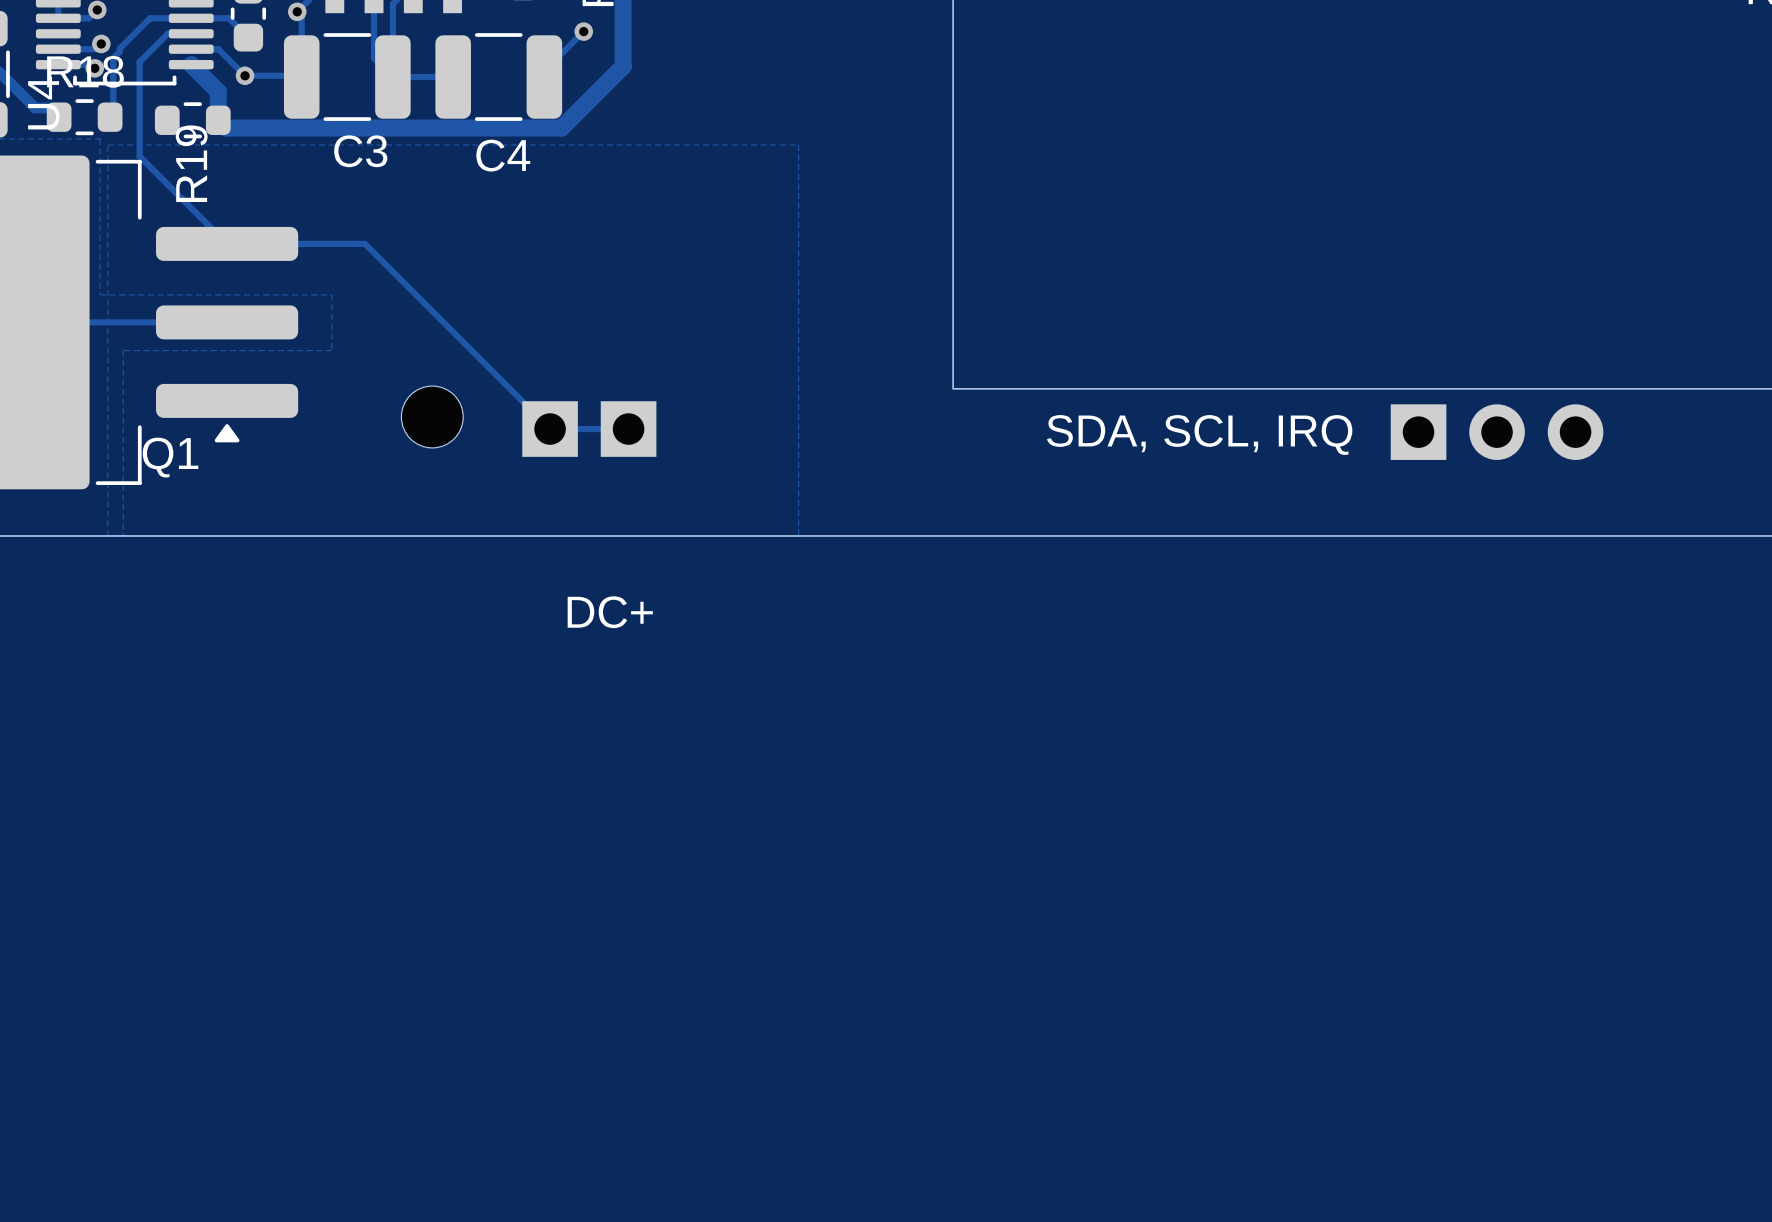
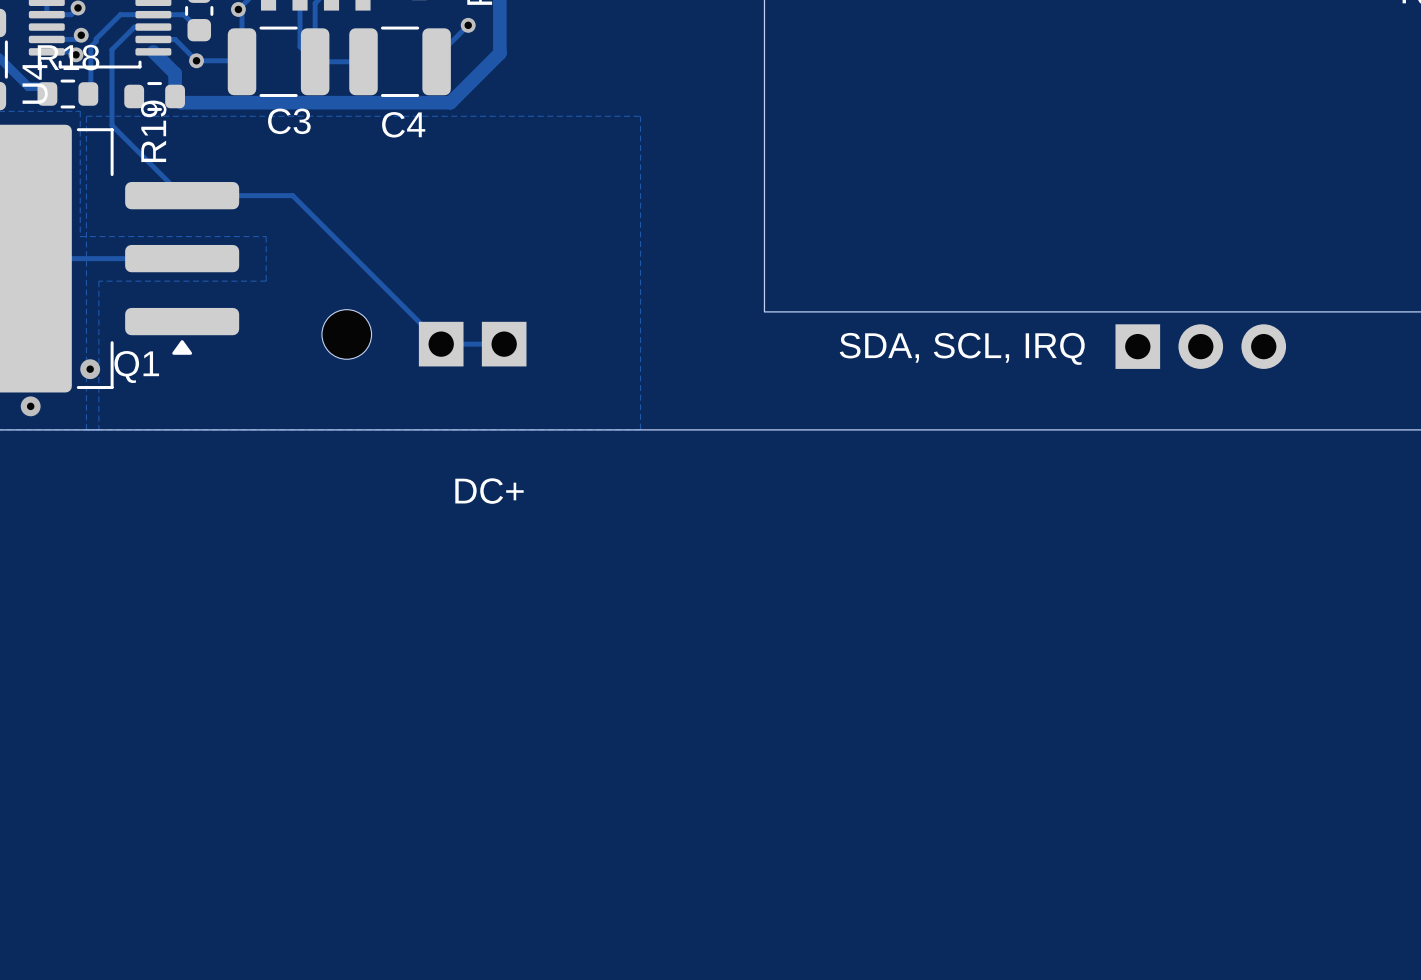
via: none -> (90, 369)
via: none -> (30, 406)

